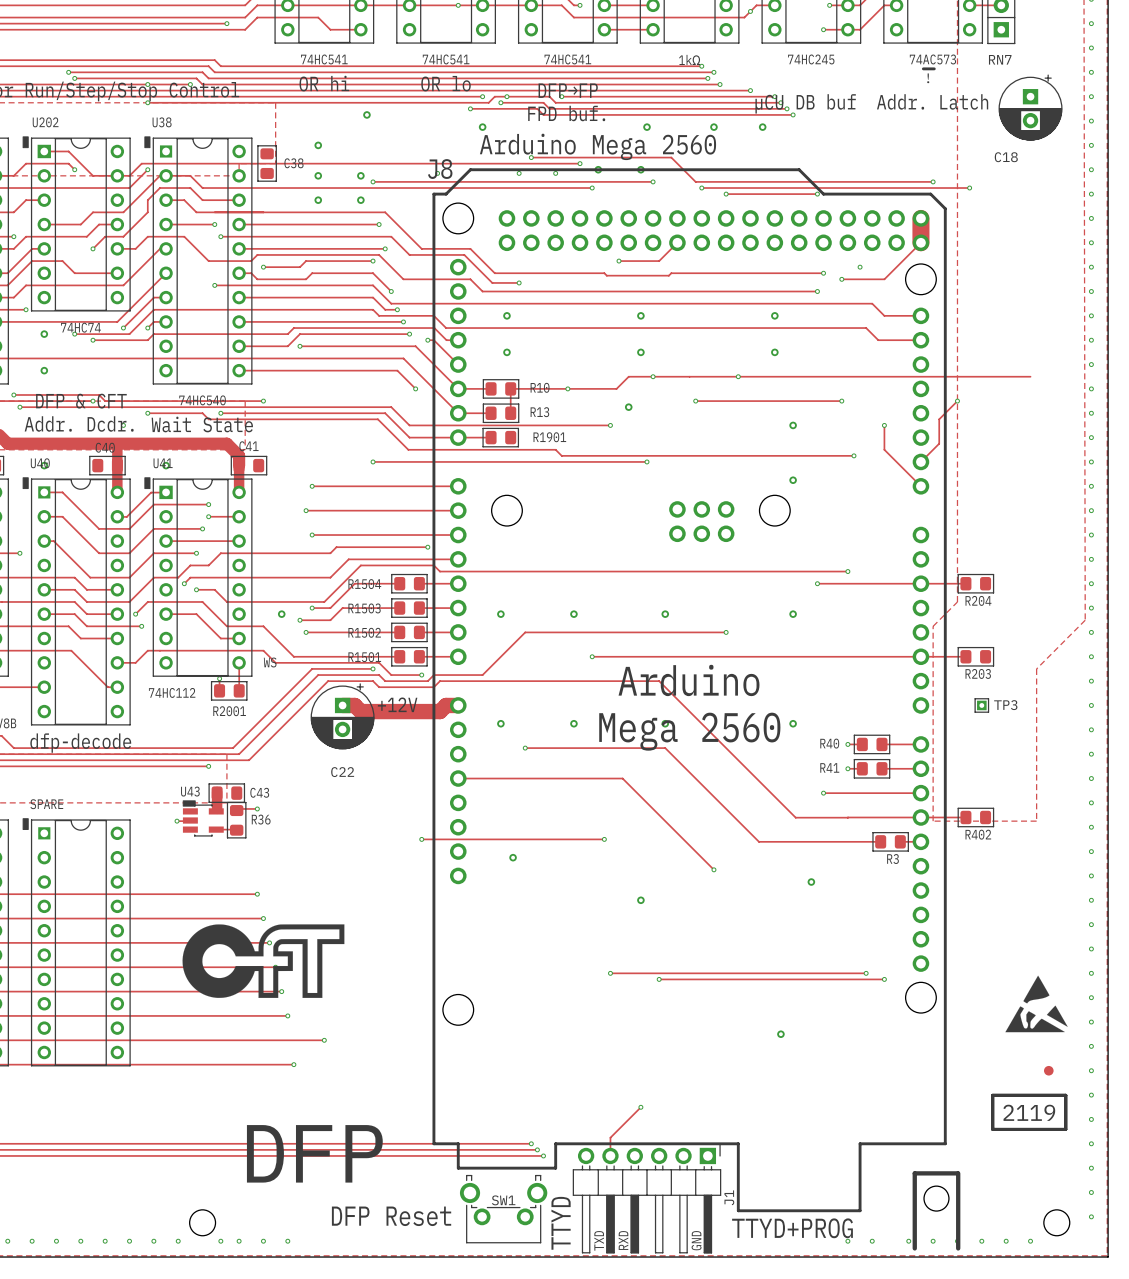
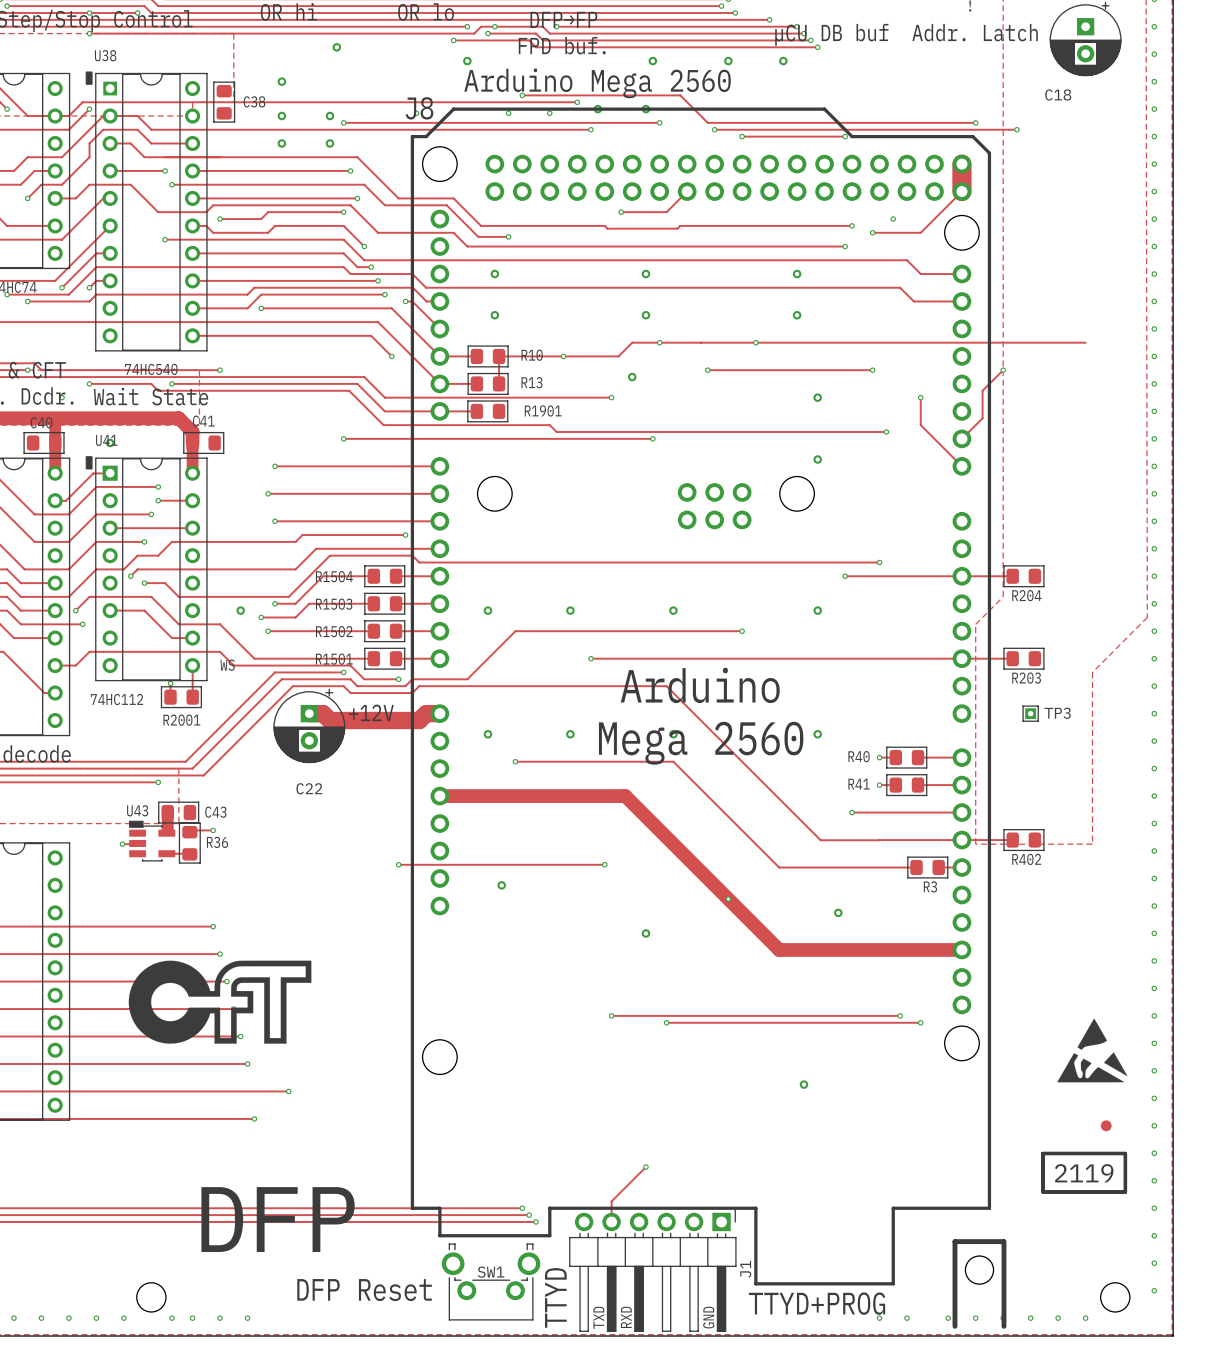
track width: thin (458, 778) (622, 778) (713, 869) -> thick (439, 796) (625, 796) (728, 899)
track: none -> (728, 899) (779, 949) (961, 949)

